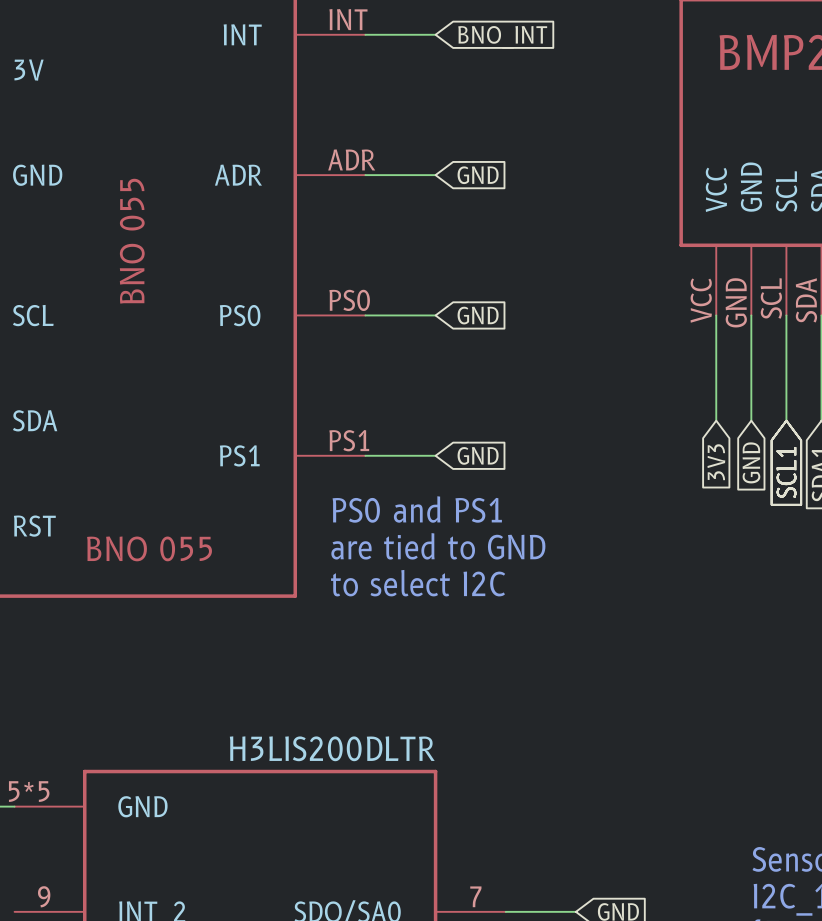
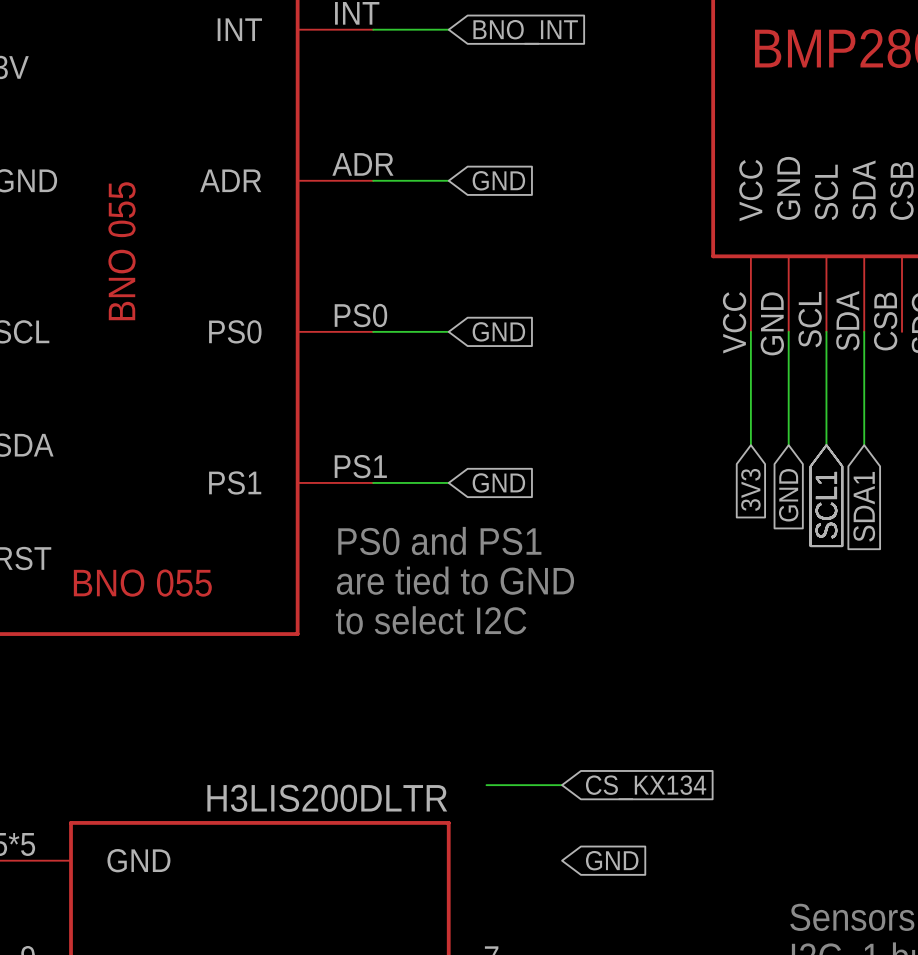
wire: none -> (486, 785) (562, 785)
global label: none -> CS_KX134 (646, 787)
global label: none -> GND (612, 860)

